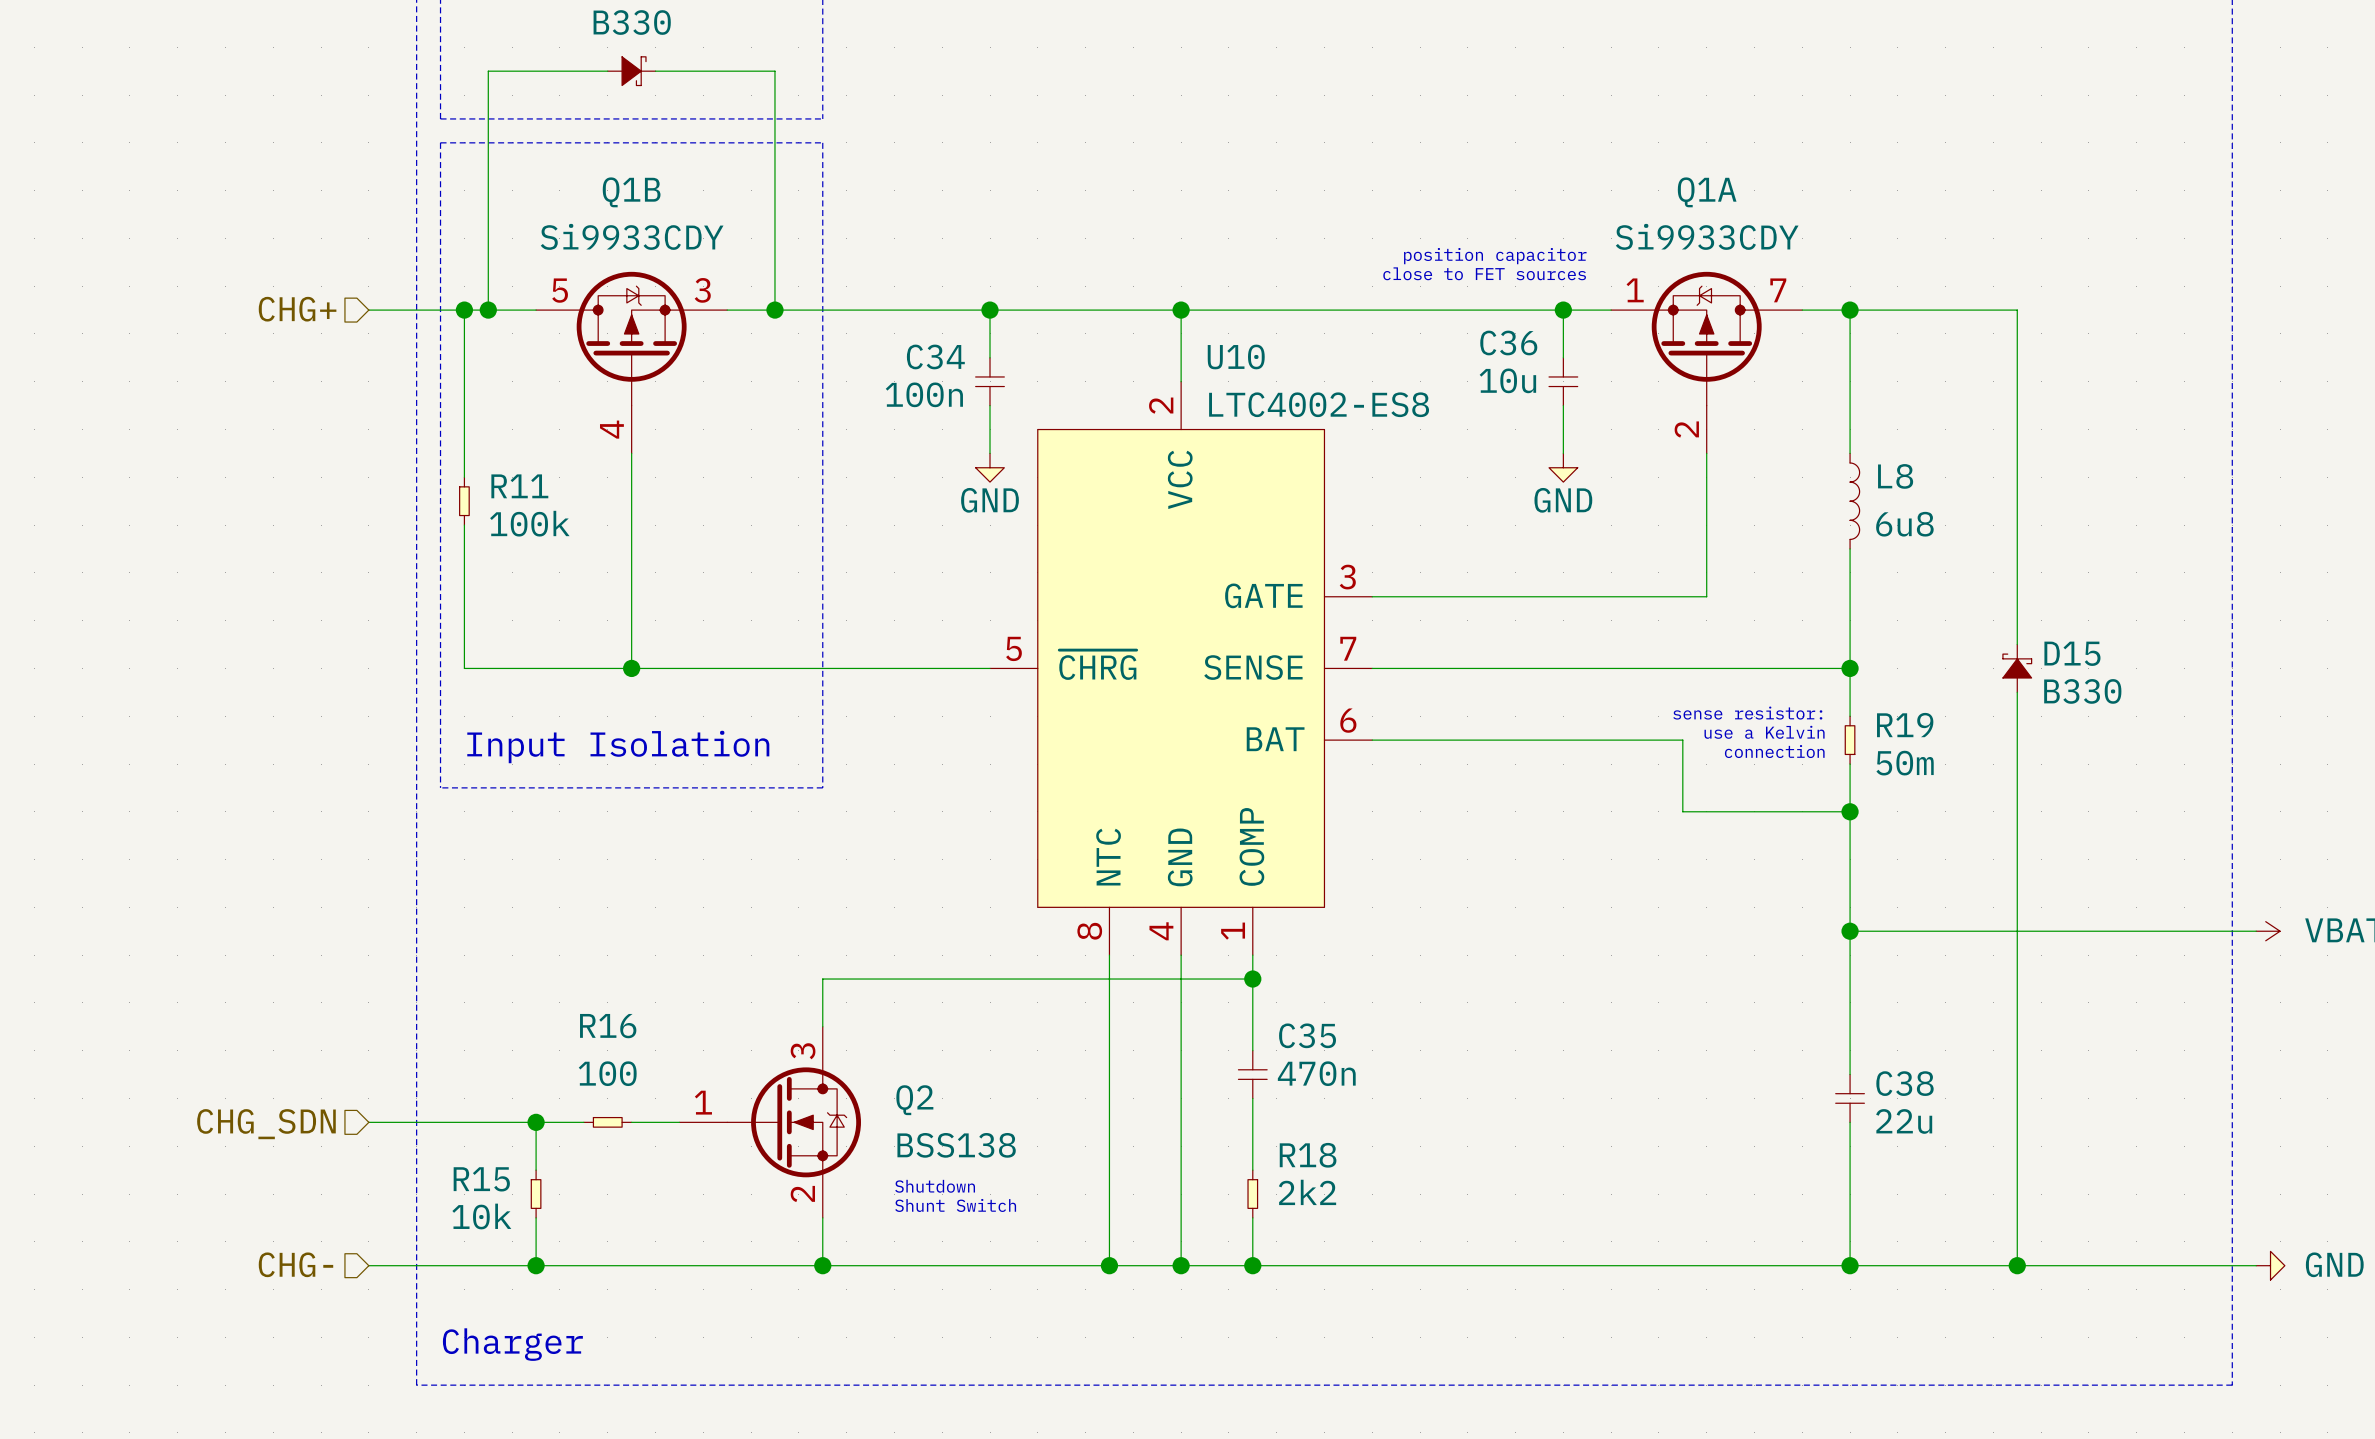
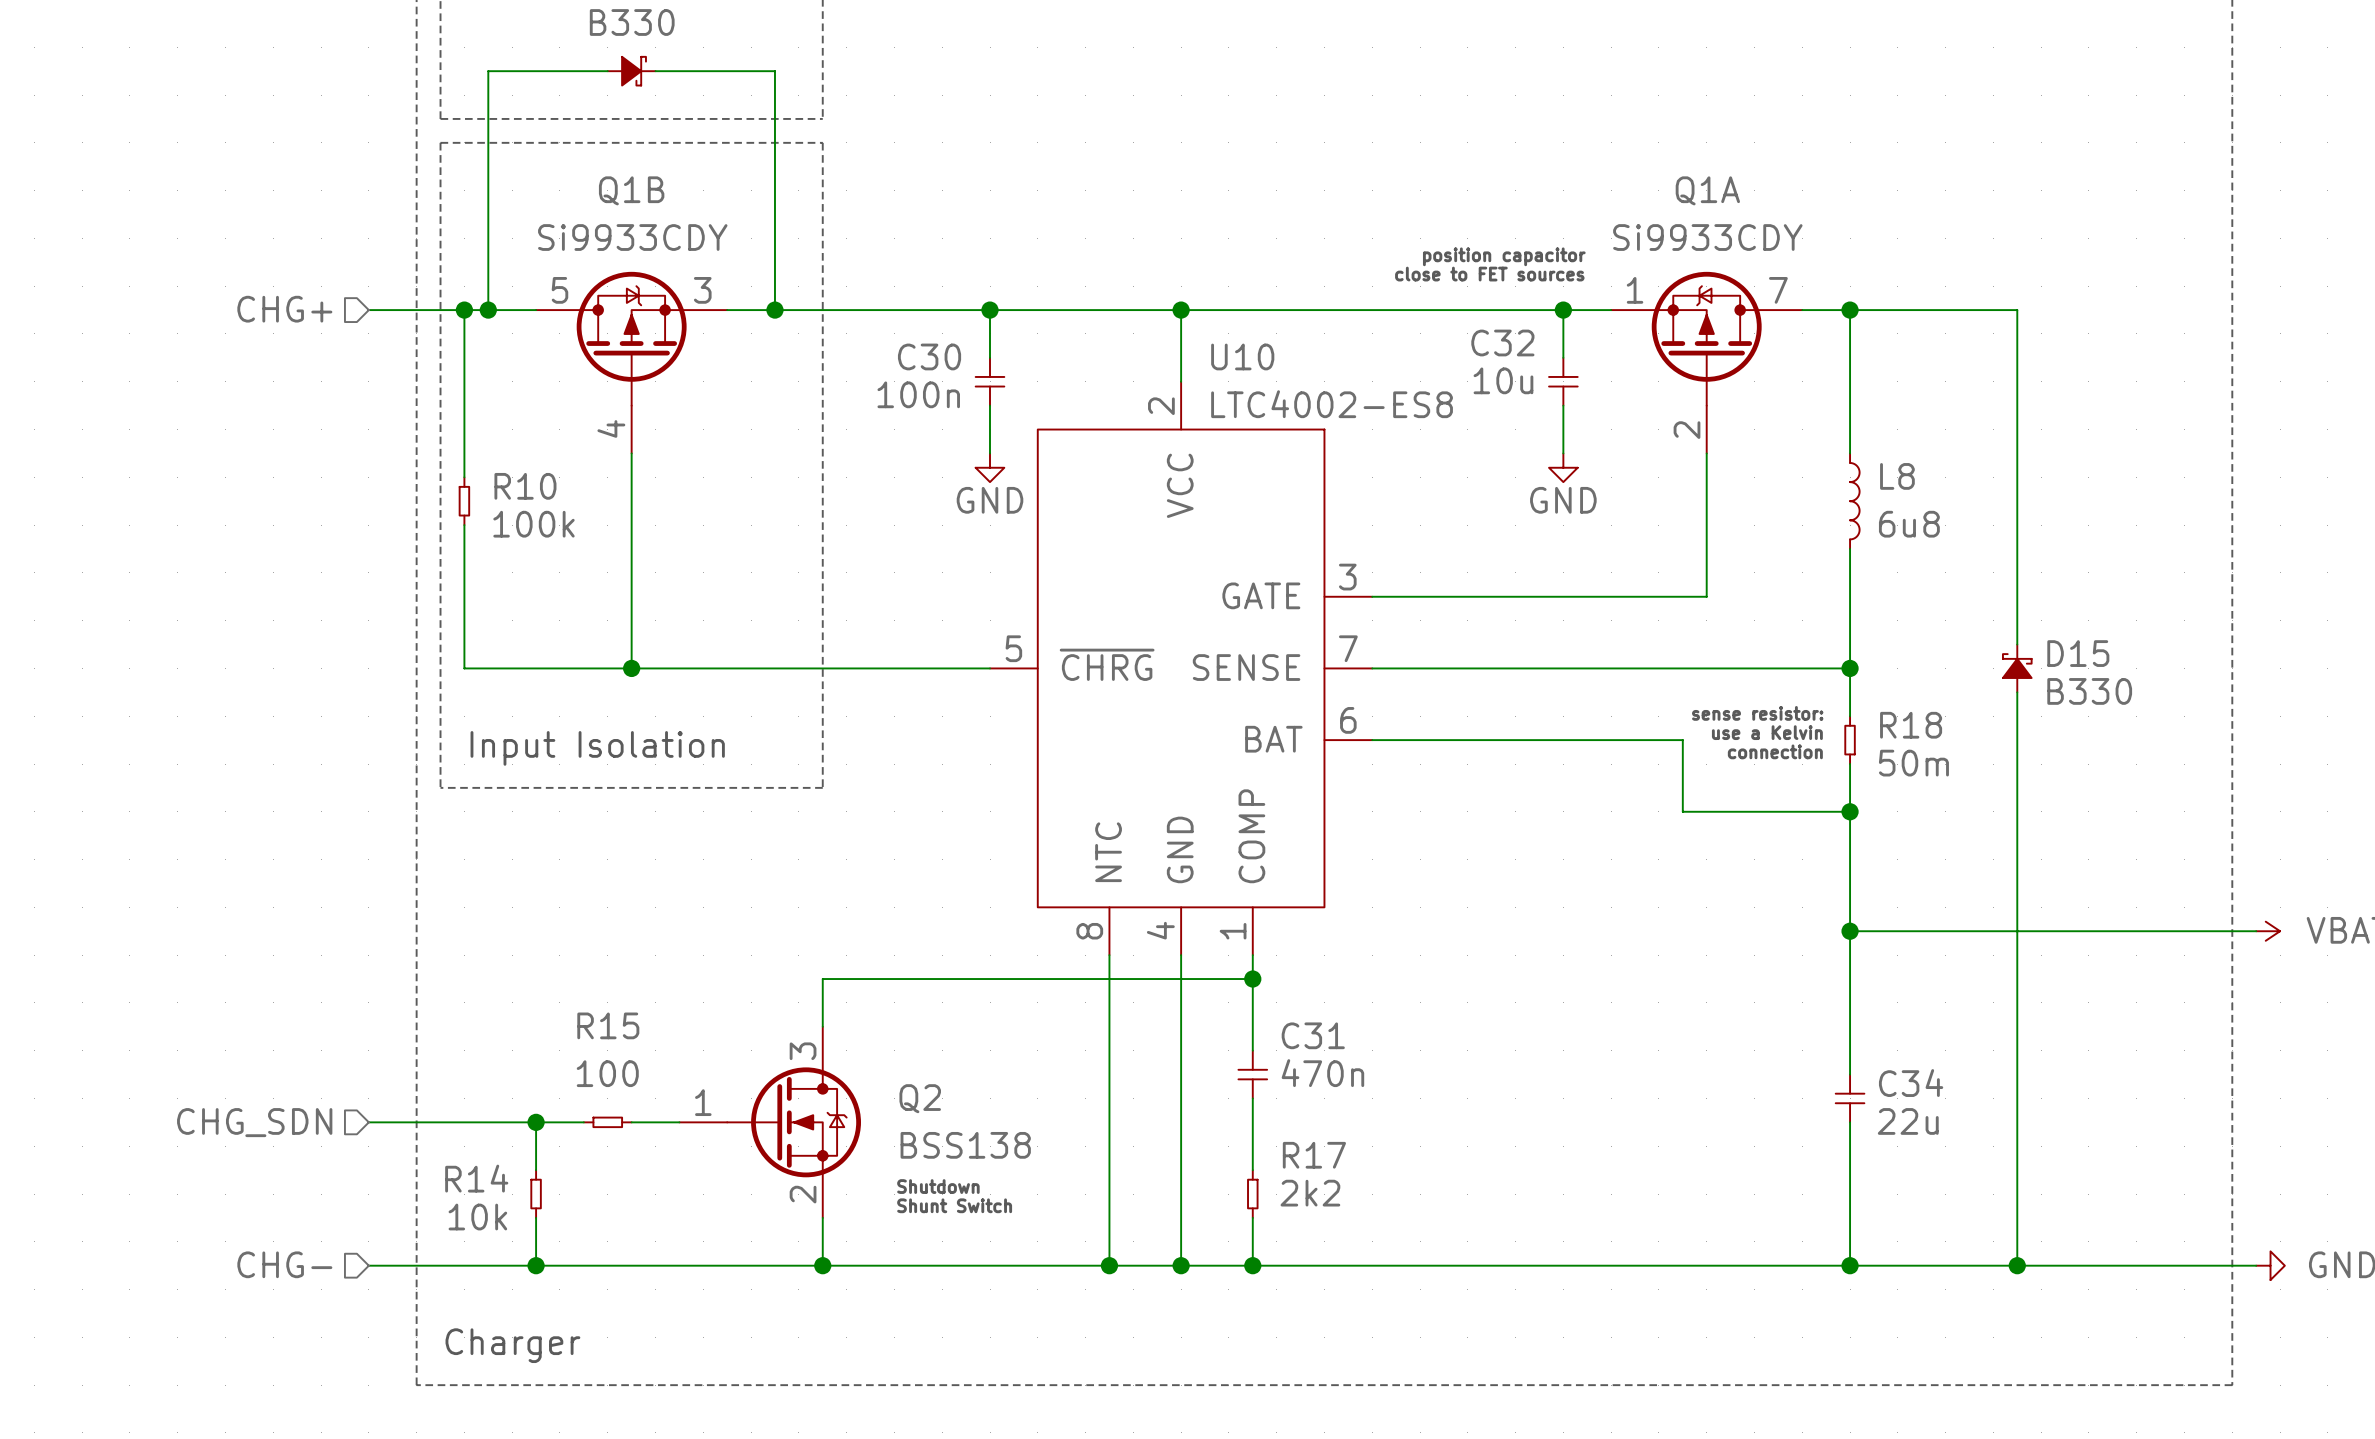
C36 name: C36 (1508, 342) -> C32 (1502, 342)
C34 name: C34 (935, 356) -> C30 (929, 356)
R11 name: R11 (519, 486) -> R10 (525, 486)
R19 name: R19 (1905, 725) -> R18 (1911, 725)
R16 name: R16 (608, 1026) -> R15 (608, 1025)
C35 name: C35 (1307, 1035) -> C31 (1313, 1035)
C38 name: C38 (1905, 1083) -> C34 (1911, 1083)
R18 name: R18 (1308, 1155) -> R17 (1314, 1155)
R15 name: R15 (481, 1179) -> R14 (476, 1178)

